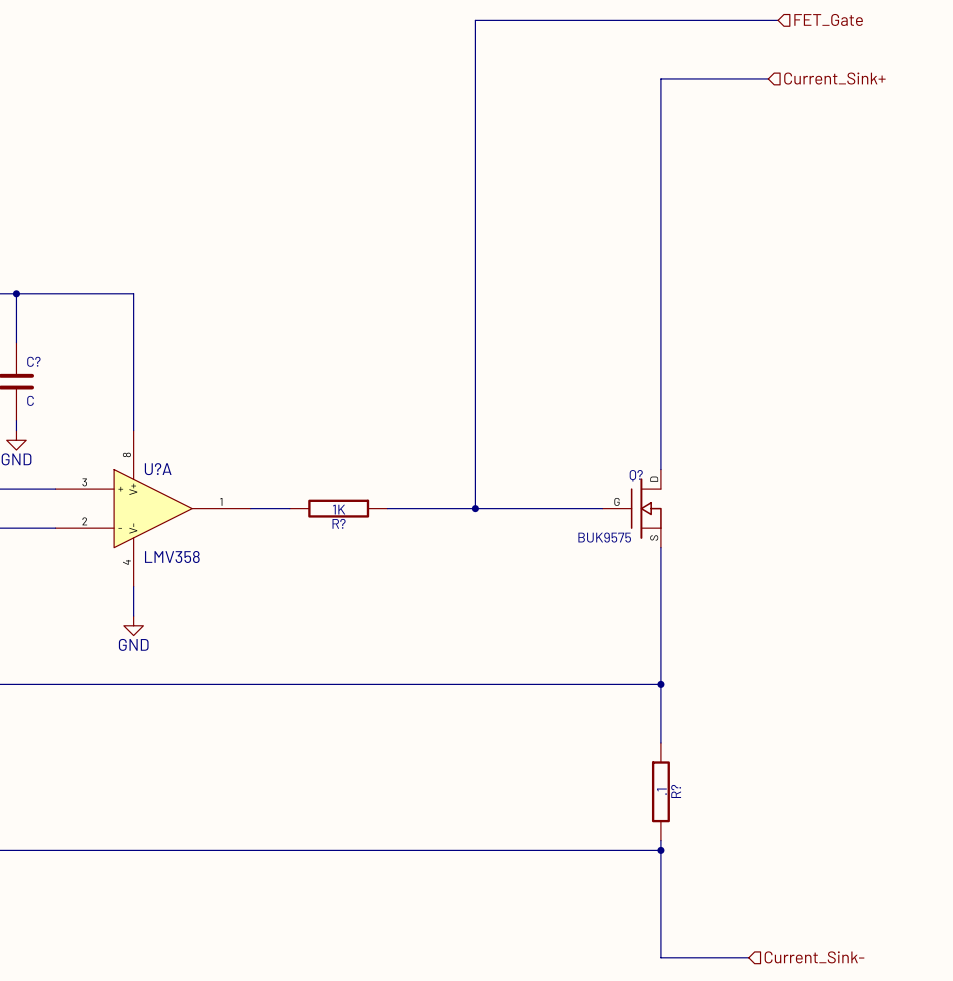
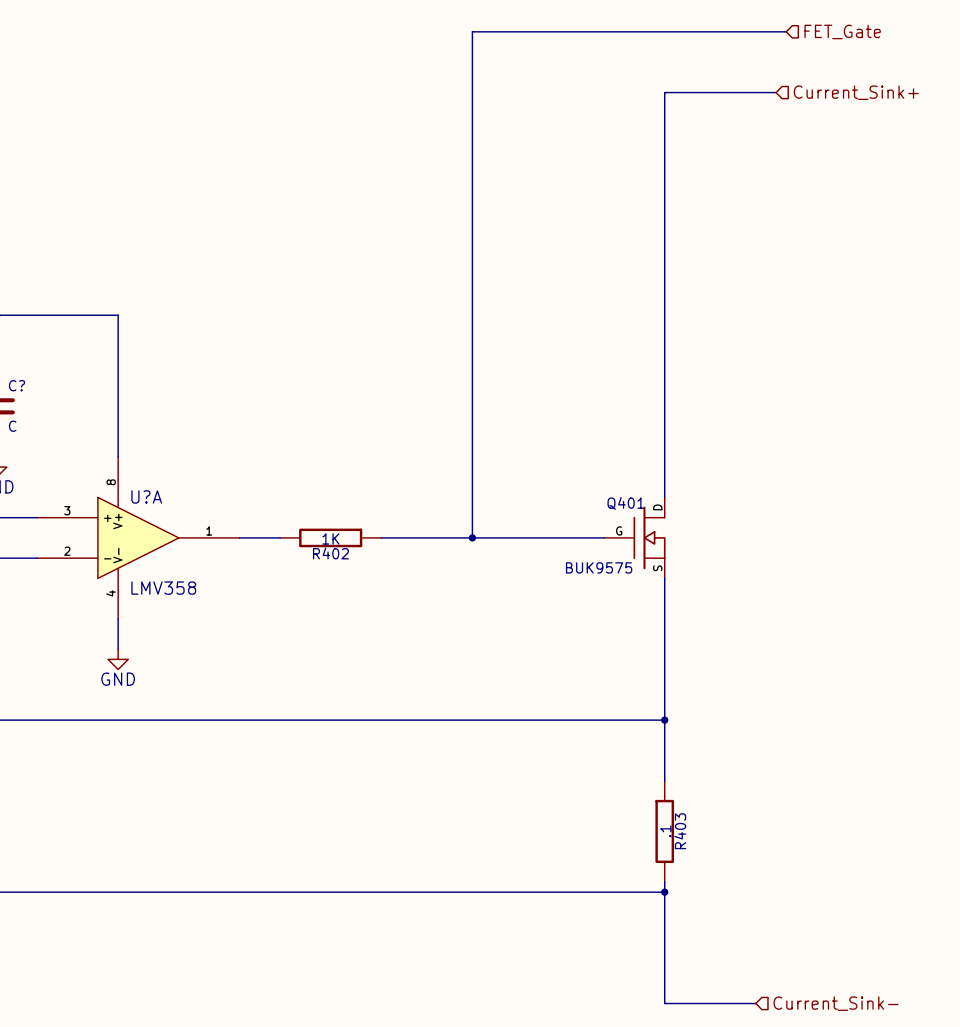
Q? name: Q? (636, 475) -> Q401 (625, 503)
R? name: R? (339, 523) -> R402 (330, 553)
R? name: R? (676, 791) -> R403 (680, 831)

